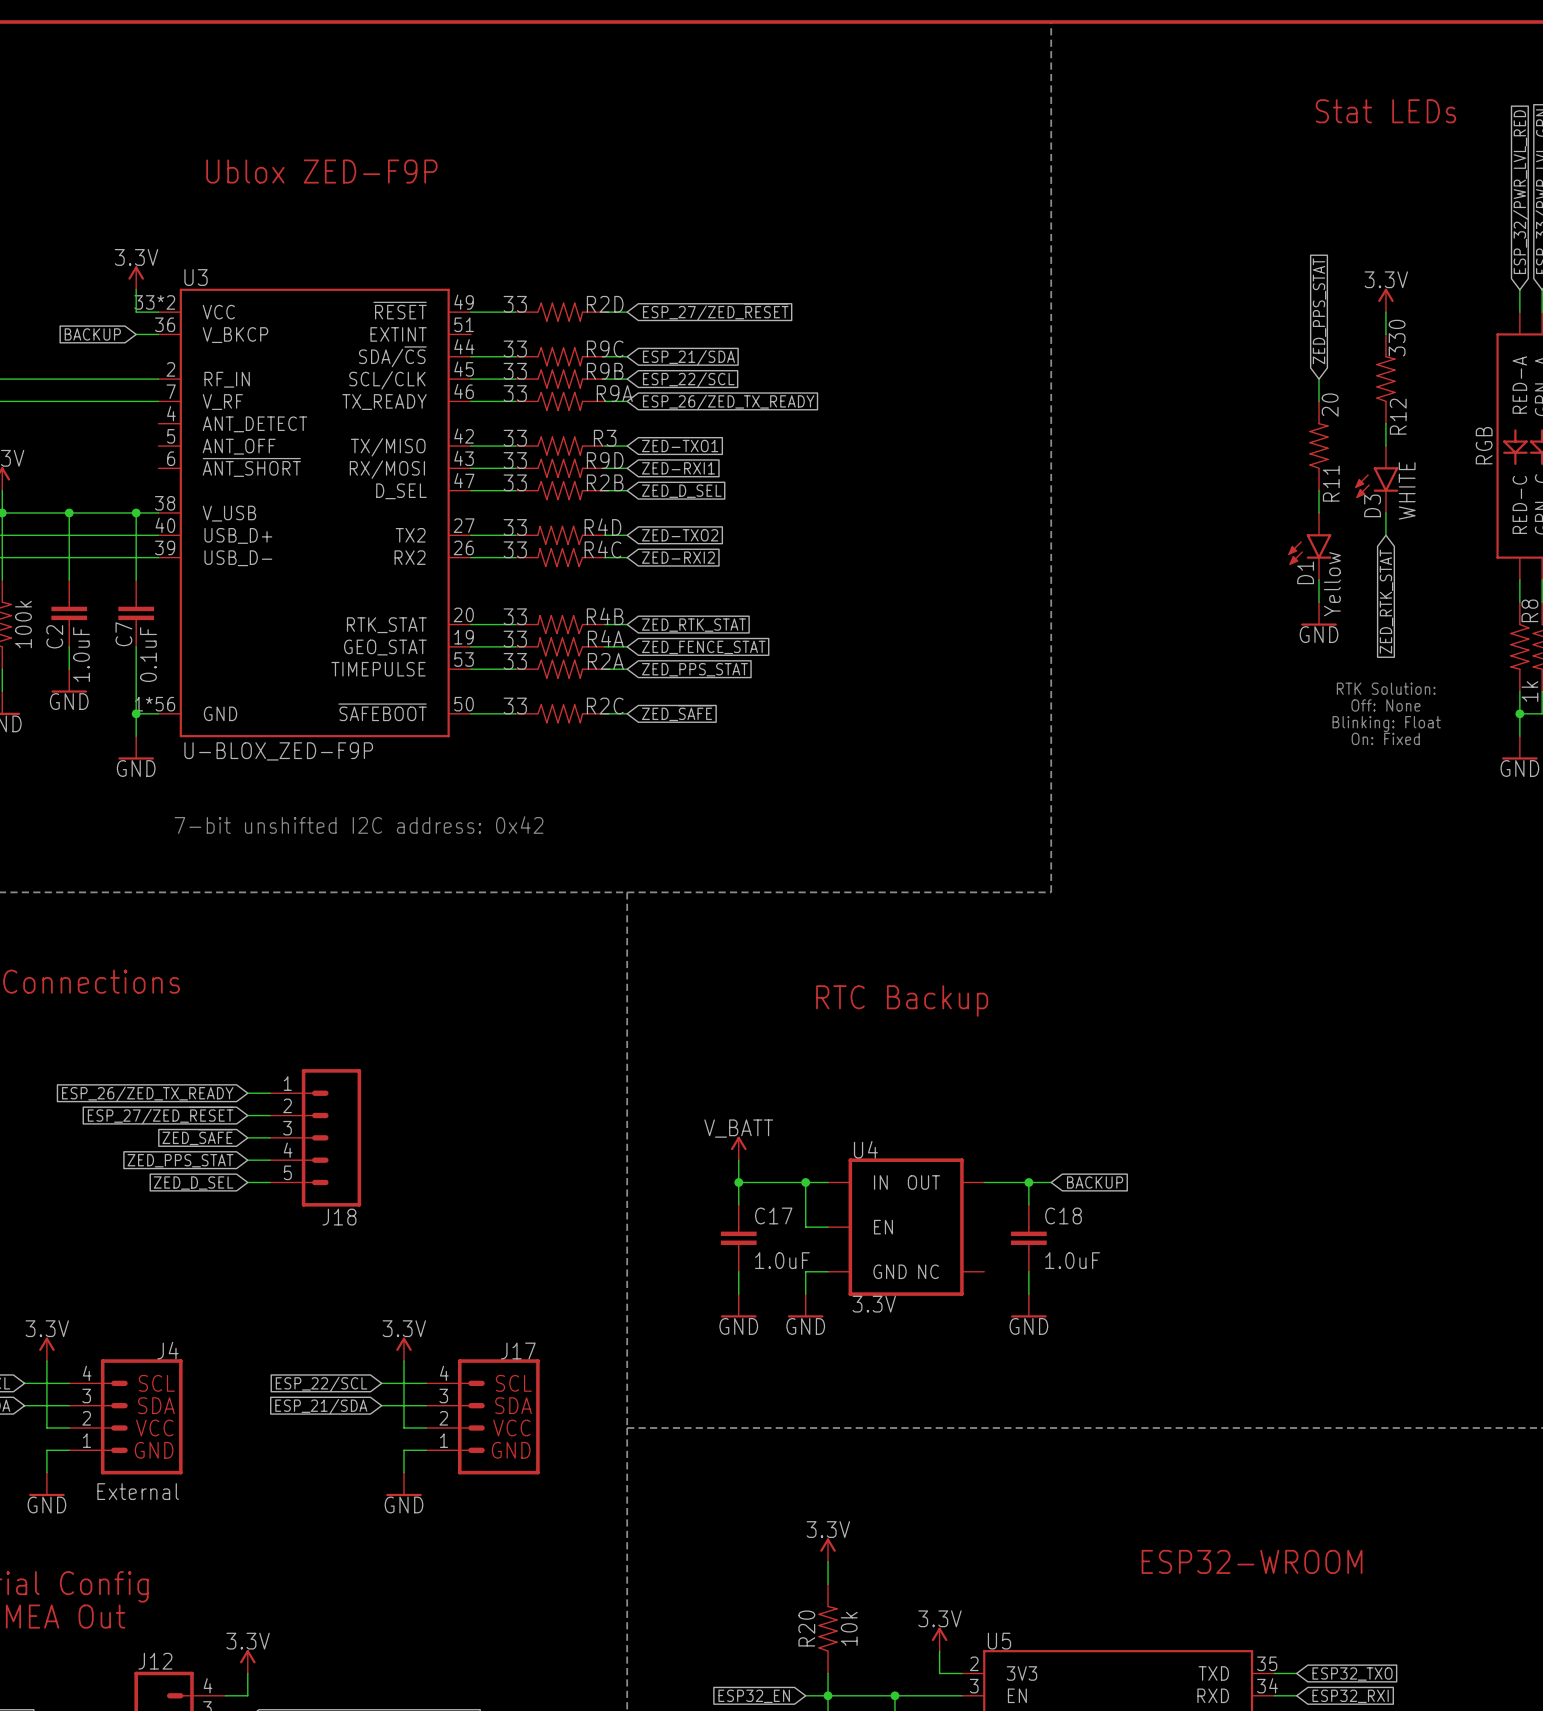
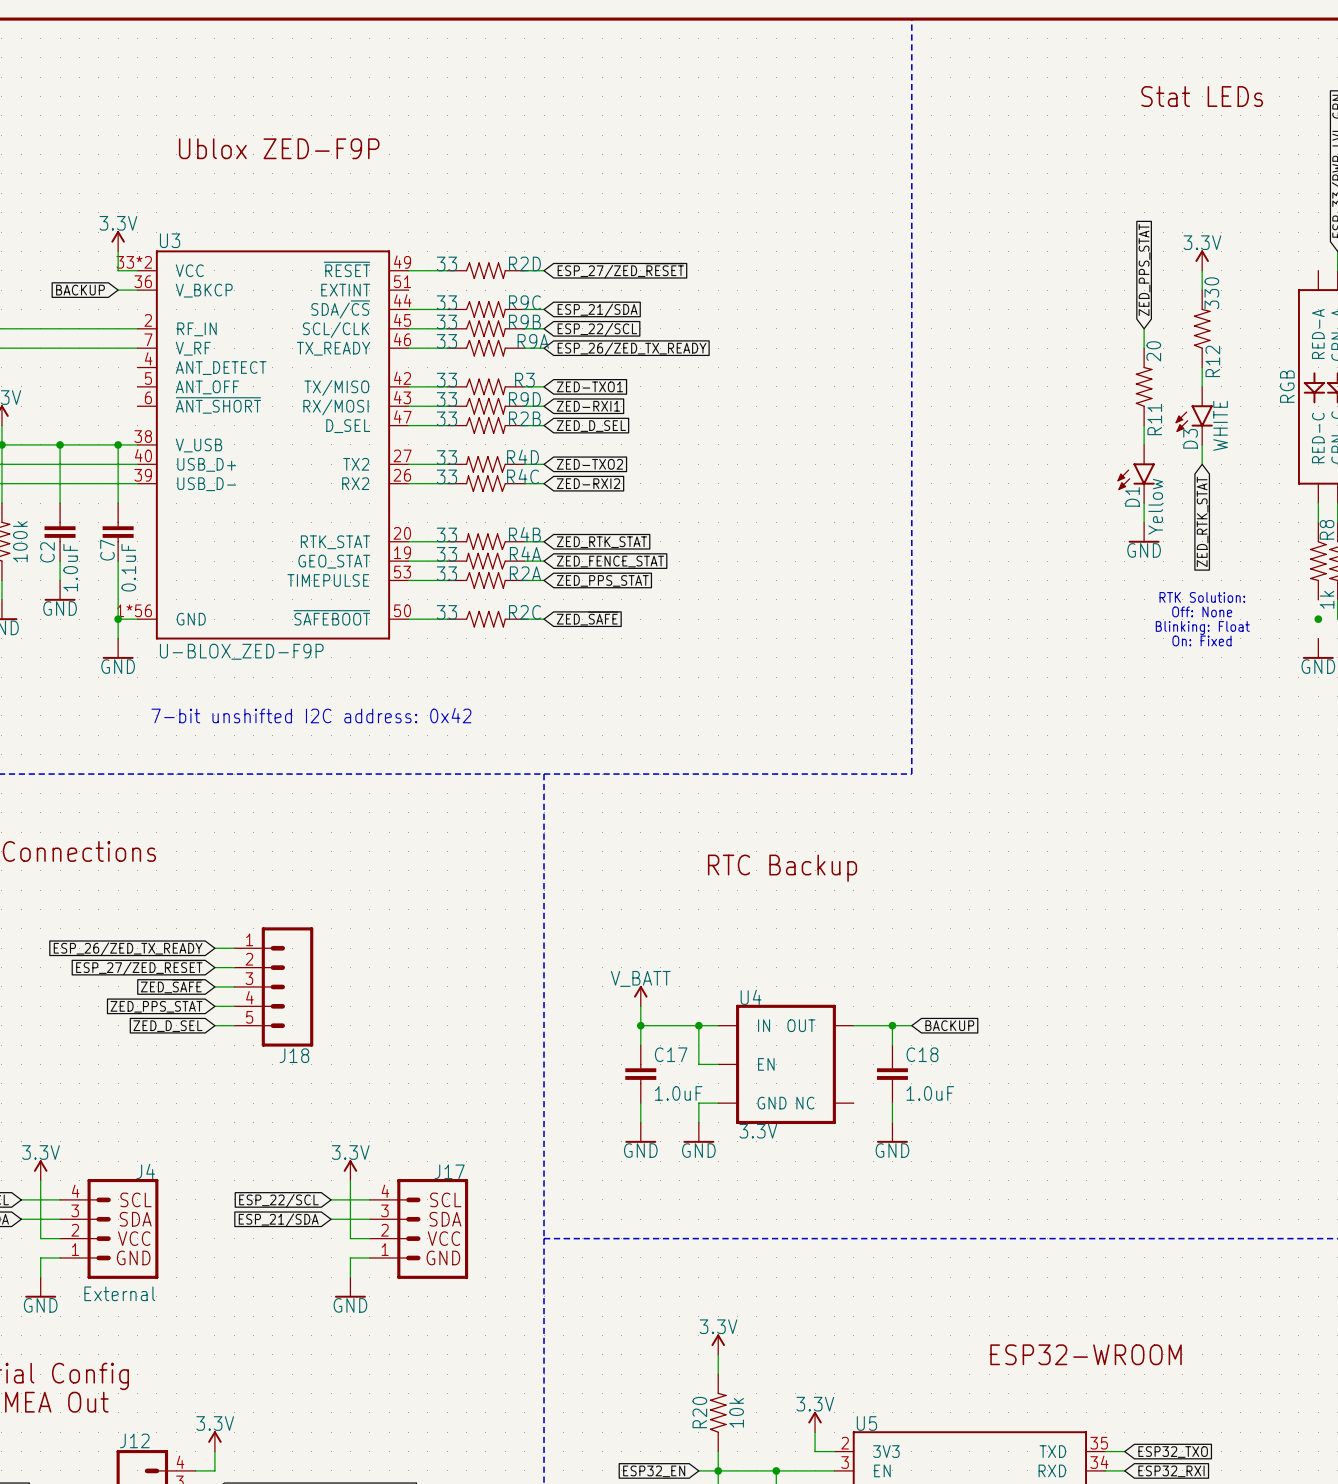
global label: ESP_32/PWR_LVL_RED (1520, 192) -> none
wire: (1519, 289) (1519, 312) -> none
wire: (1519, 691) (1519, 736) -> none
wire: (1519, 713) (1542, 713) -> none

